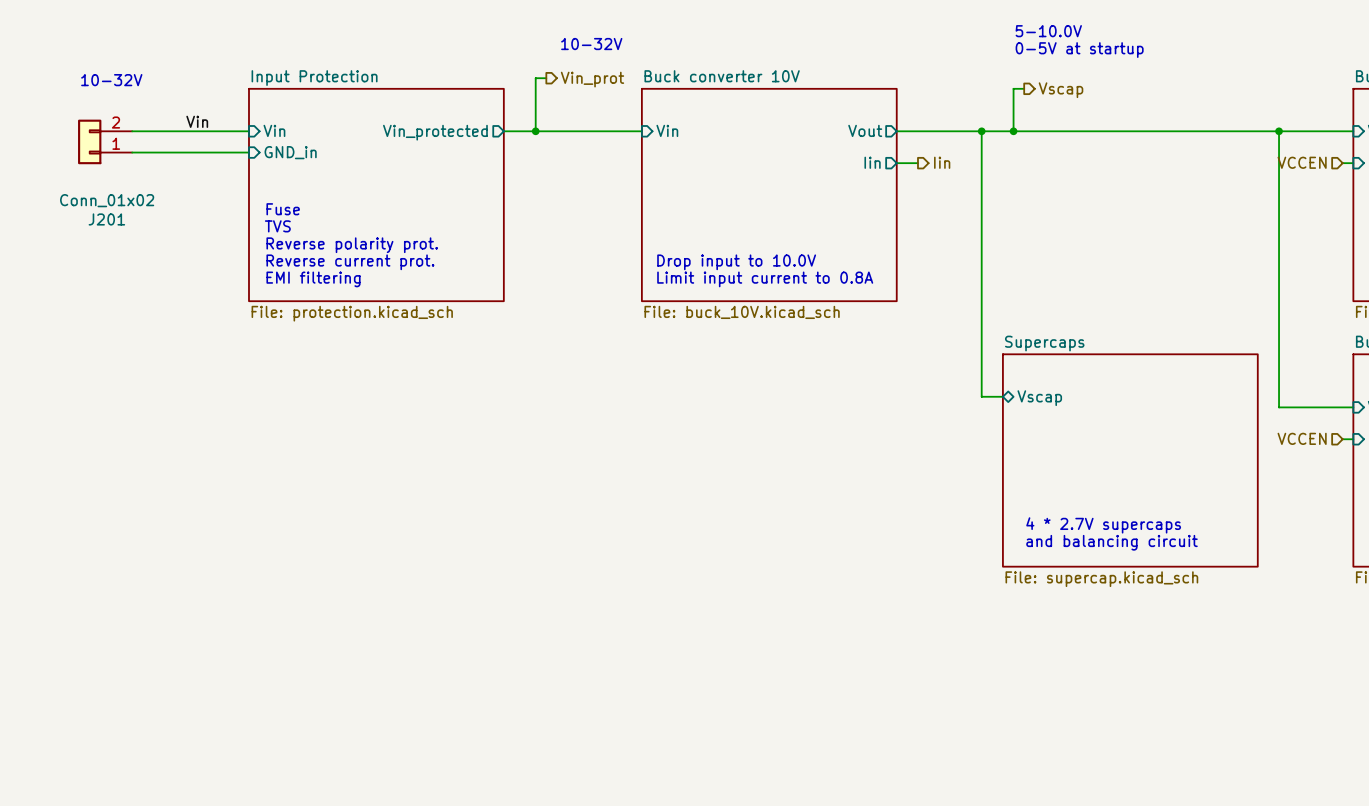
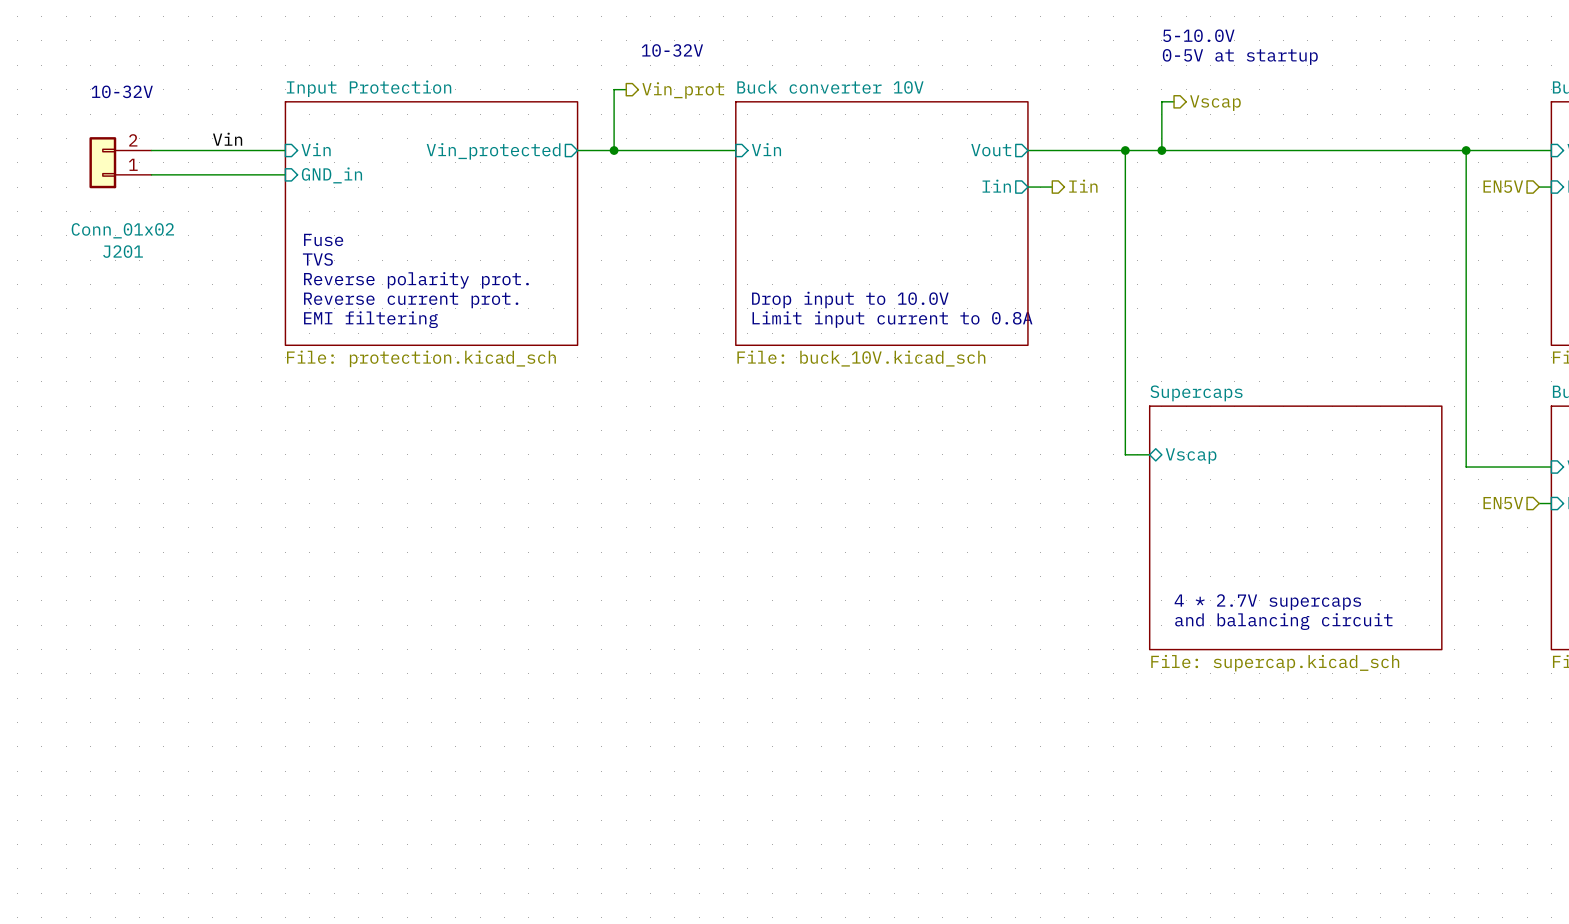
hierarchical label: VCCEN (1302, 162) -> EN5V (1503, 186)
hierarchical label: VCCEN (1302, 438) -> EN5V (1503, 503)

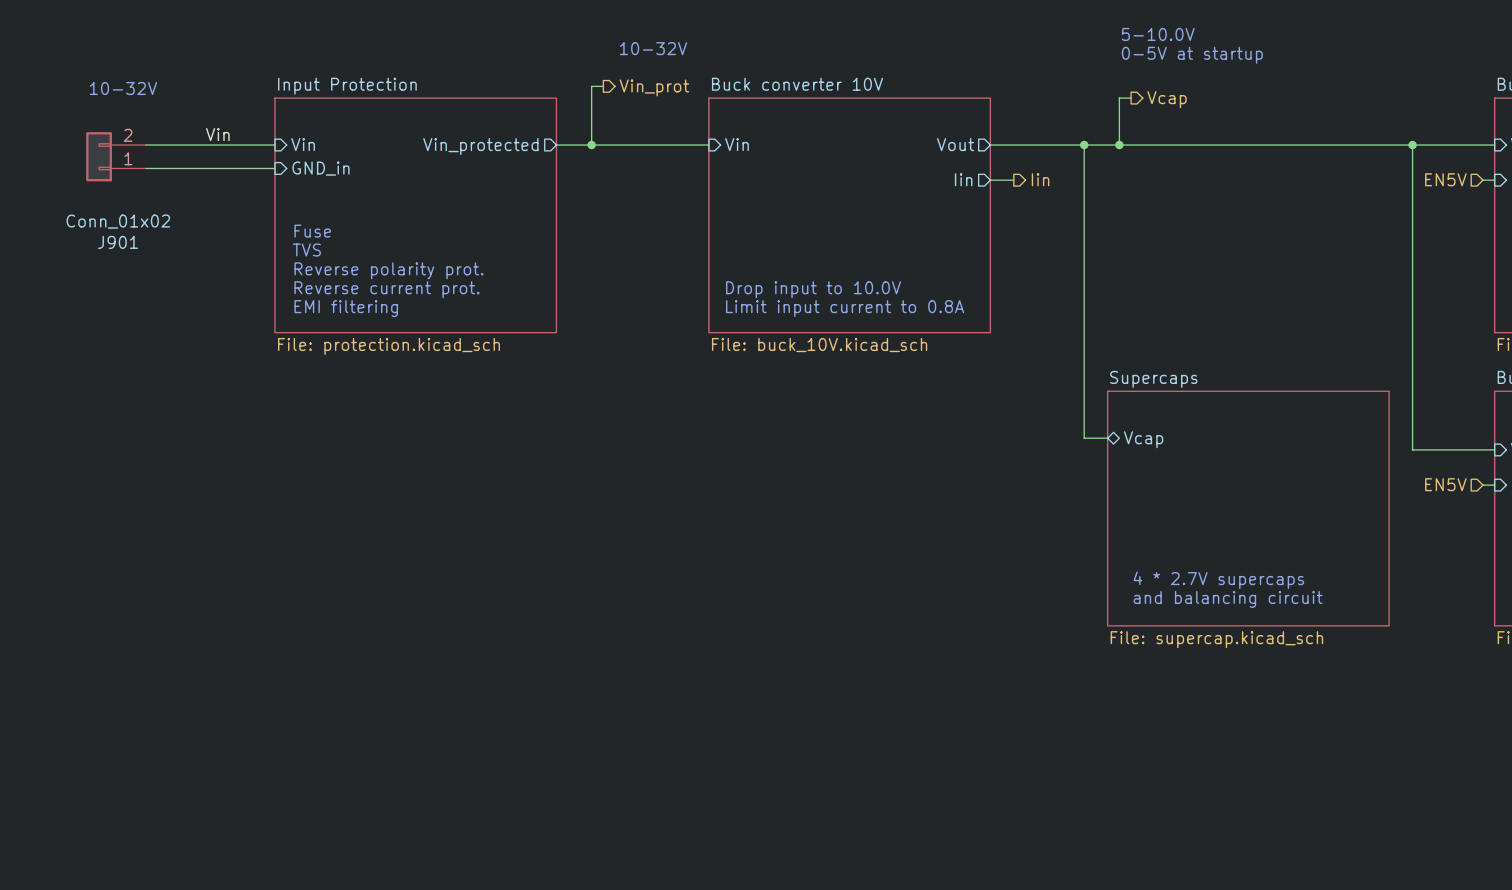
hierarchical label: Vscap (1215, 103) -> Vcap (1167, 99)
J201 name: J201 (123, 251) -> J901 (118, 242)
sheet pin: Vscap (1191, 456) -> Vcap (1143, 439)

